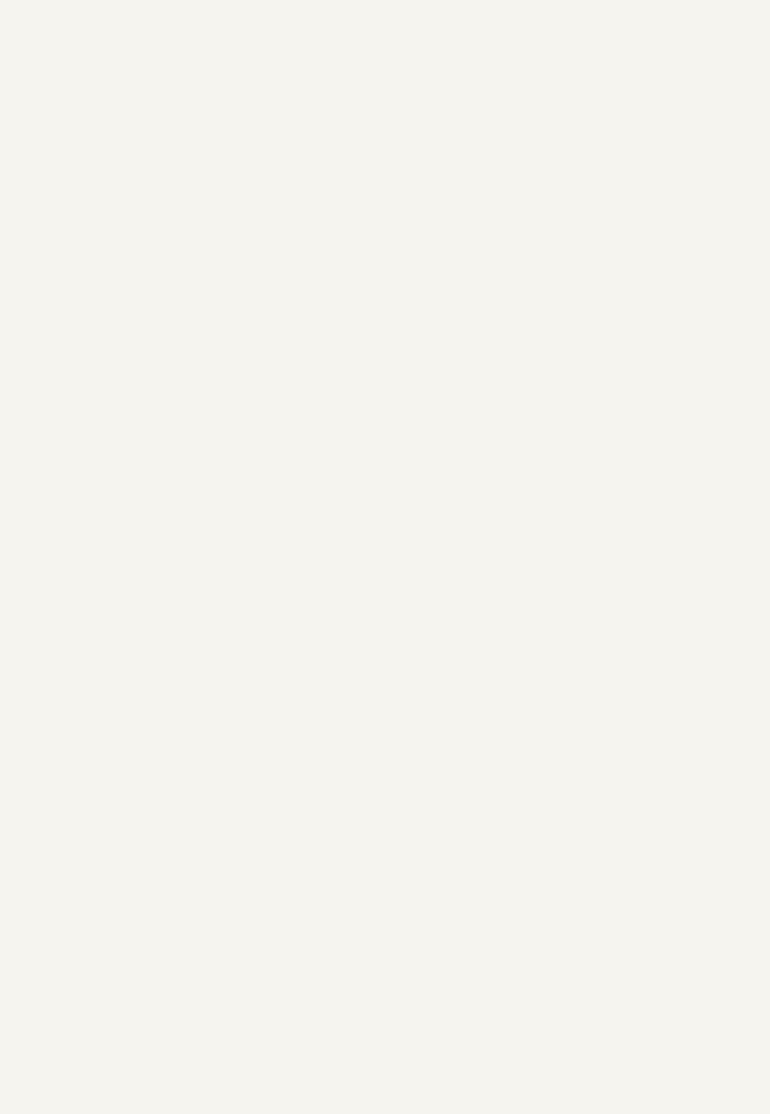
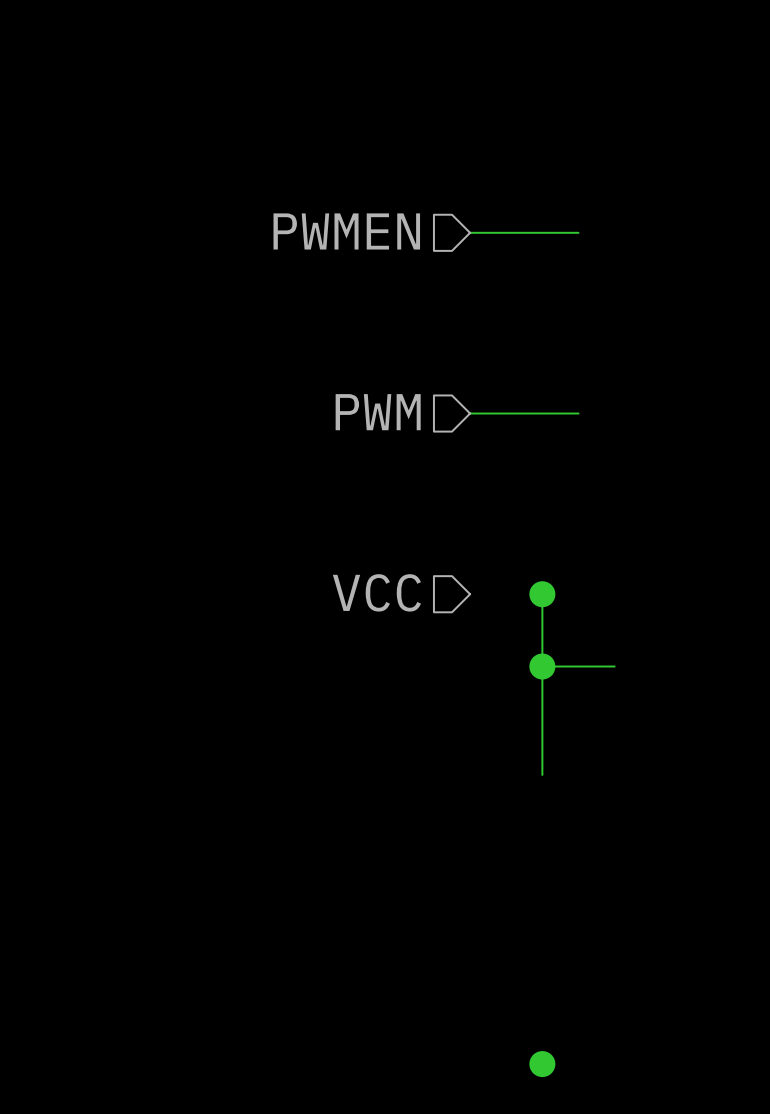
hierarchical label: none -> PWMEN (346, 231)
wire: none -> (470, 232) (578, 232)
hierarchical label: none -> PWM (378, 412)
wire: none -> (470, 413) (578, 413)
hierarchical label: none -> VCC (376, 592)
wire: none -> (542, 594) (542, 774)
junction: none -> (542, 594)
wire: none -> (542, 666) (614, 666)
junction: none -> (542, 666)
junction: none -> (542, 1064)

